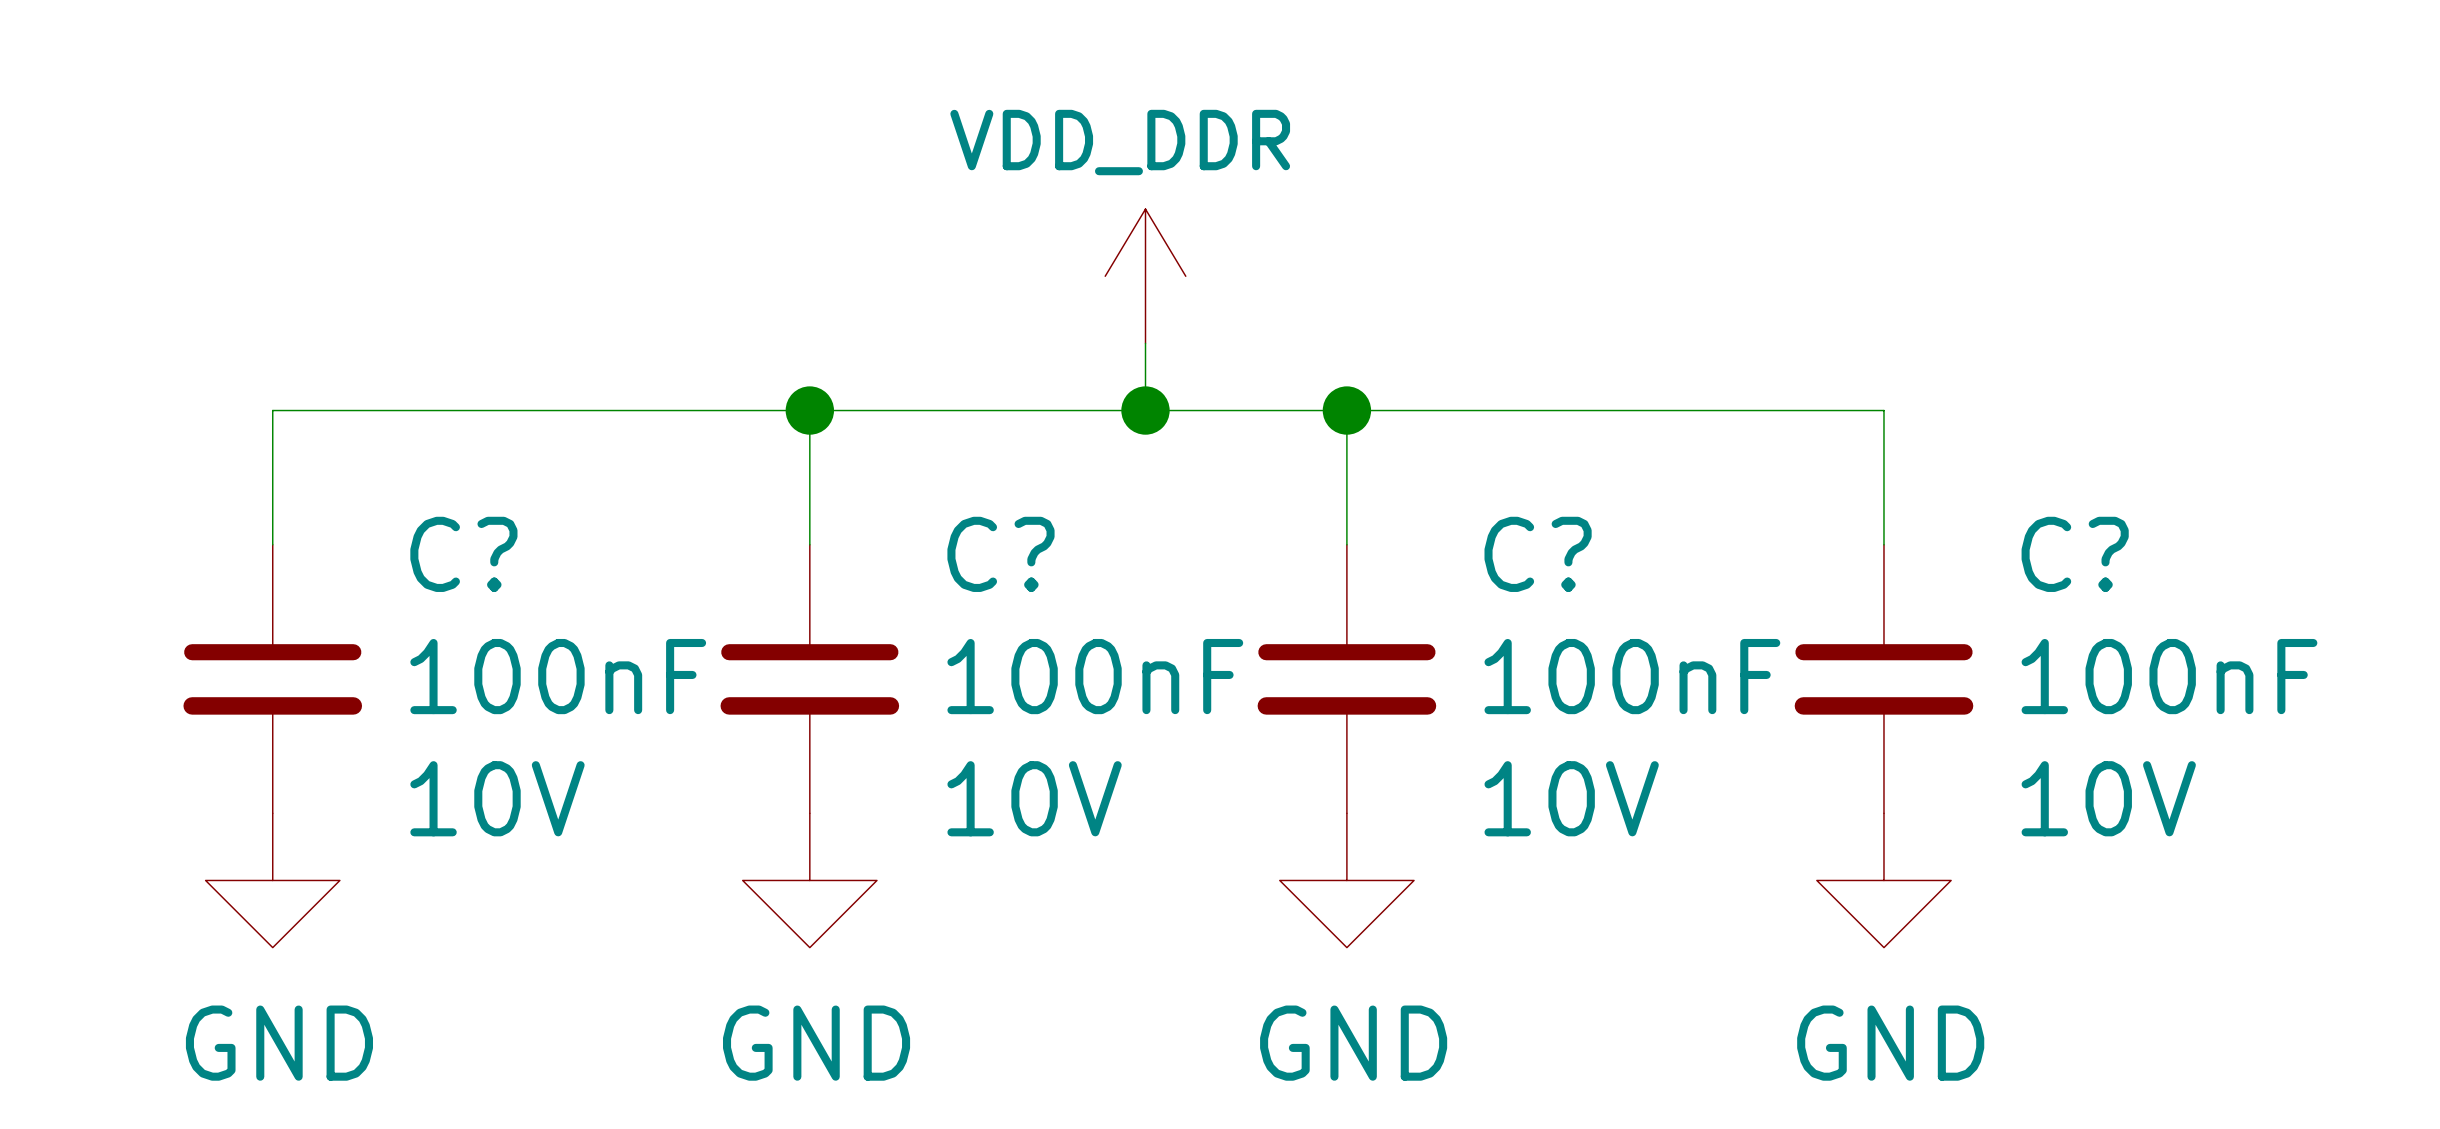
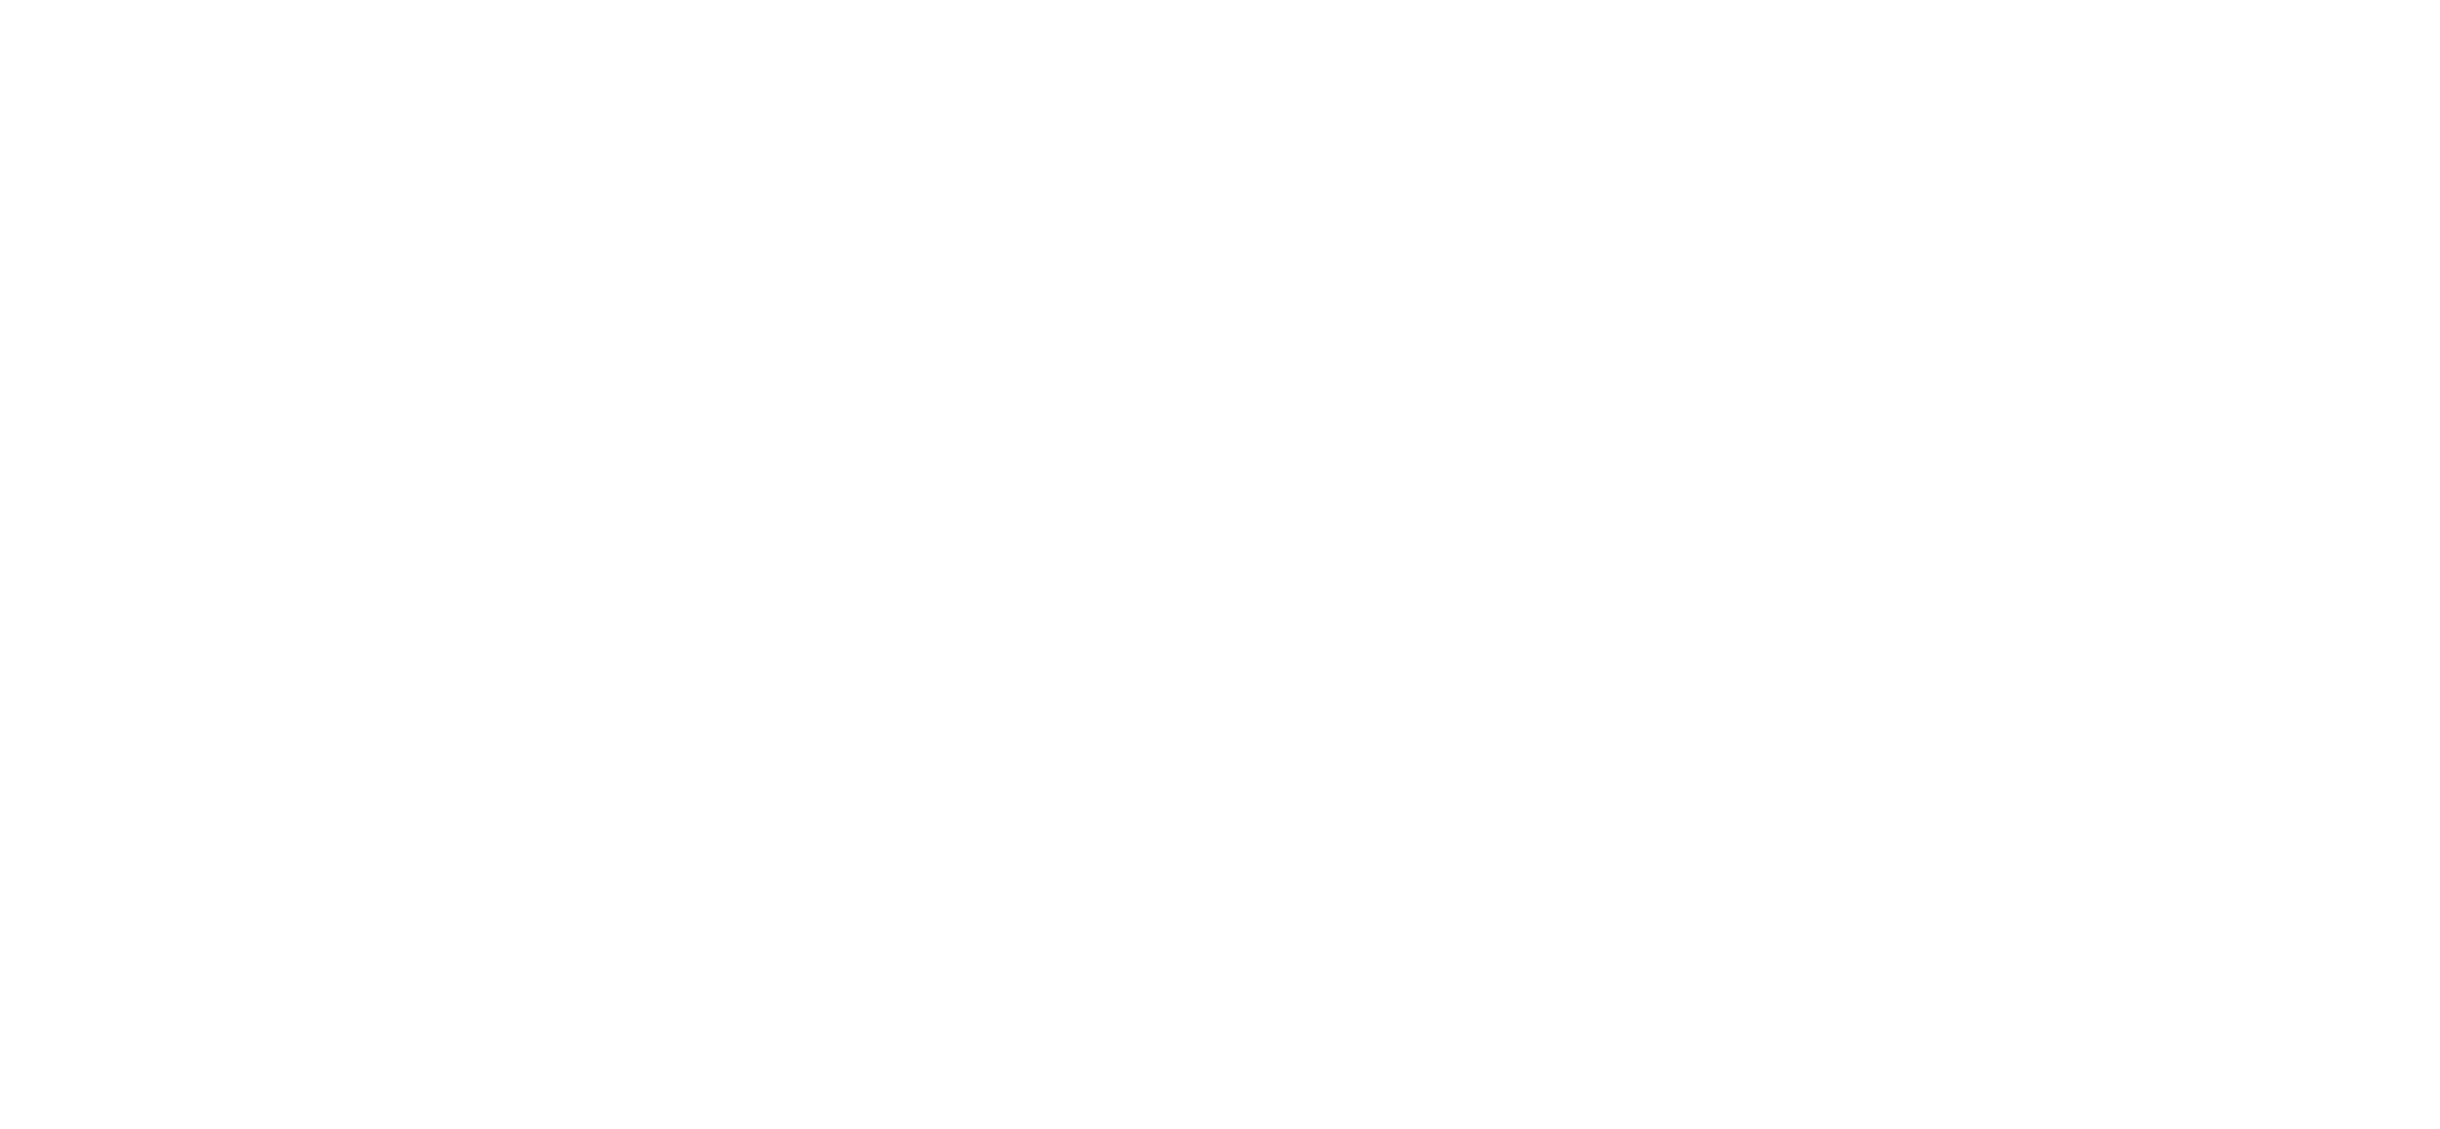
part: VDD_DDR (1145, 276) -> none
wire: (1145, 343) (1145, 410) -> none
wire: (809, 410) (809, 544) -> none
junction: (809, 410) -> none
junction: (1145, 410) -> none
wire: (1346, 410) (1346, 544) -> none
junction: (1346, 410) -> none
wire: (272, 544) (272, 410) (1883, 410) (1883, 544) -> none
C?: 100nF (272, 679) -> none
C?: 100nF (809, 679) -> none
C?: 100nF (1346, 679) -> none
C?: 100nF (1883, 679) -> none
power symbol: GND (272, 880) -> none
power symbol: GND (809, 880) -> none
power symbol: GND (1346, 880) -> none
power symbol: GND (1883, 880) -> none

